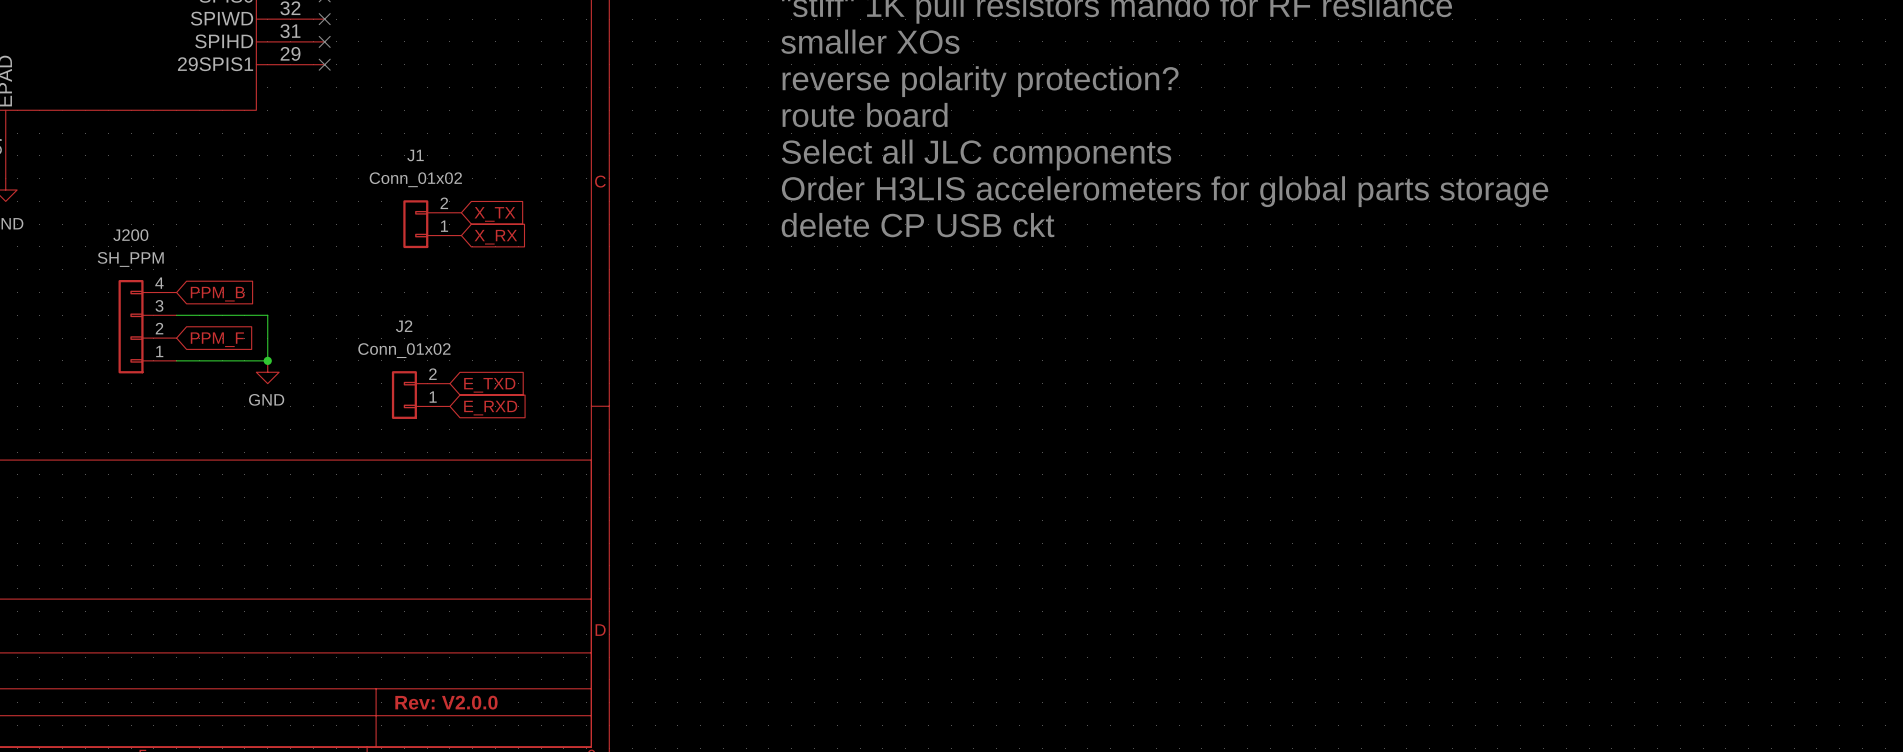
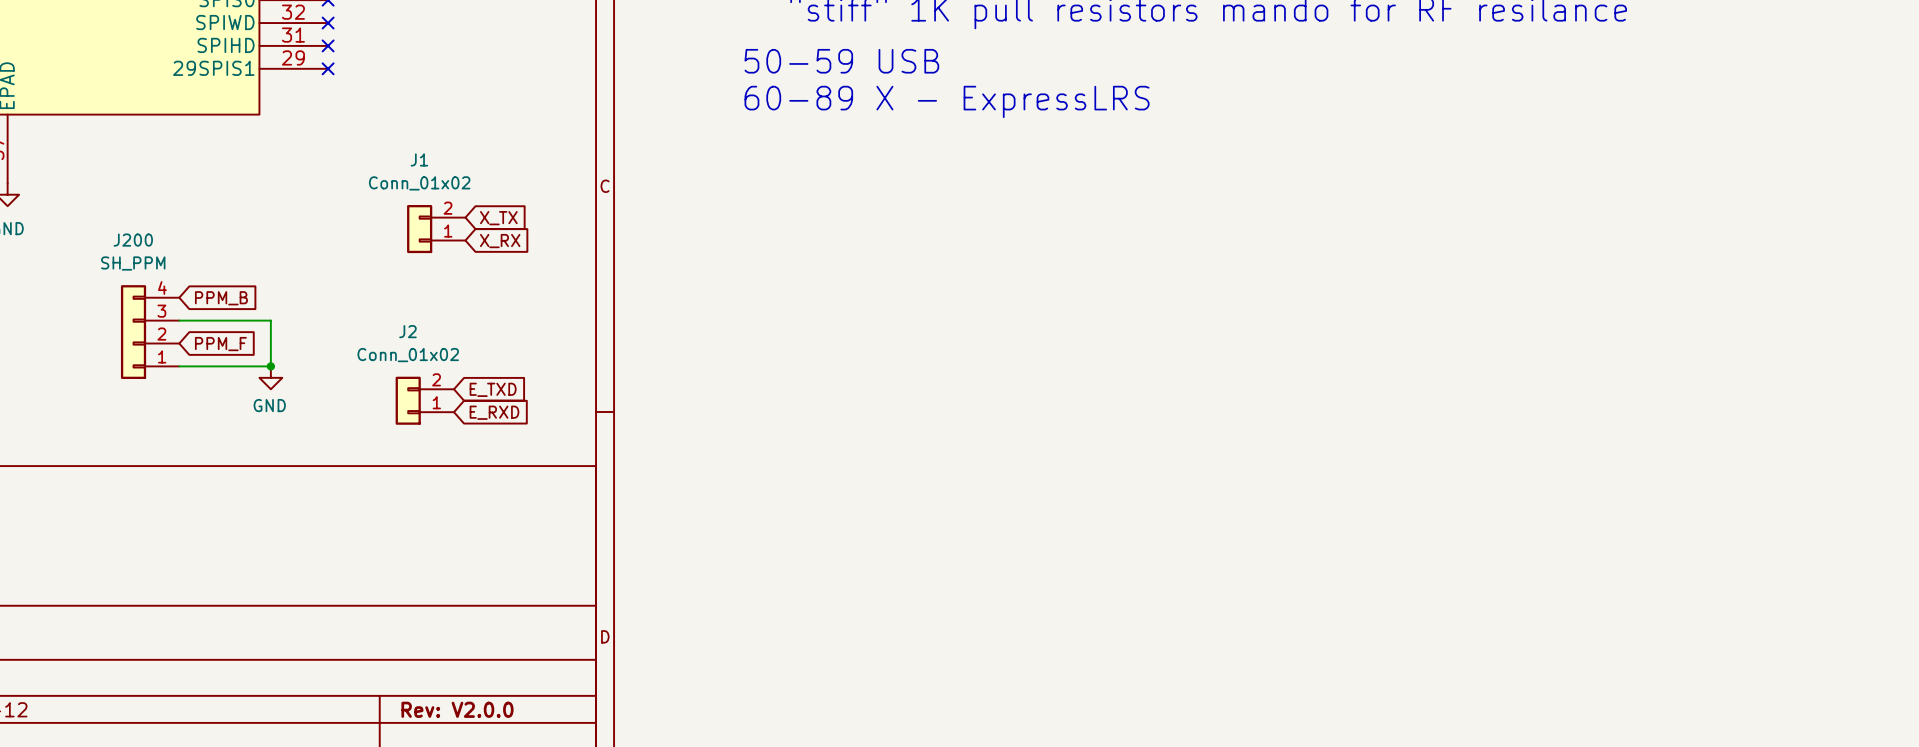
text: smaller XOs (870, 41) -> none
text: none -> 50-59 USB (841, 61)
text: reverse polarity protection? (980, 81) -> none
text: none -> 60-89 X - ExpressLRS (947, 101)
text: route board (865, 115) -> none
text: Select all JLC components (976, 154) -> none
text: Order H3LIS accelerometers for global parts storage (1165, 191) -> none
text: delete CP USB ckt (918, 225) -> none

